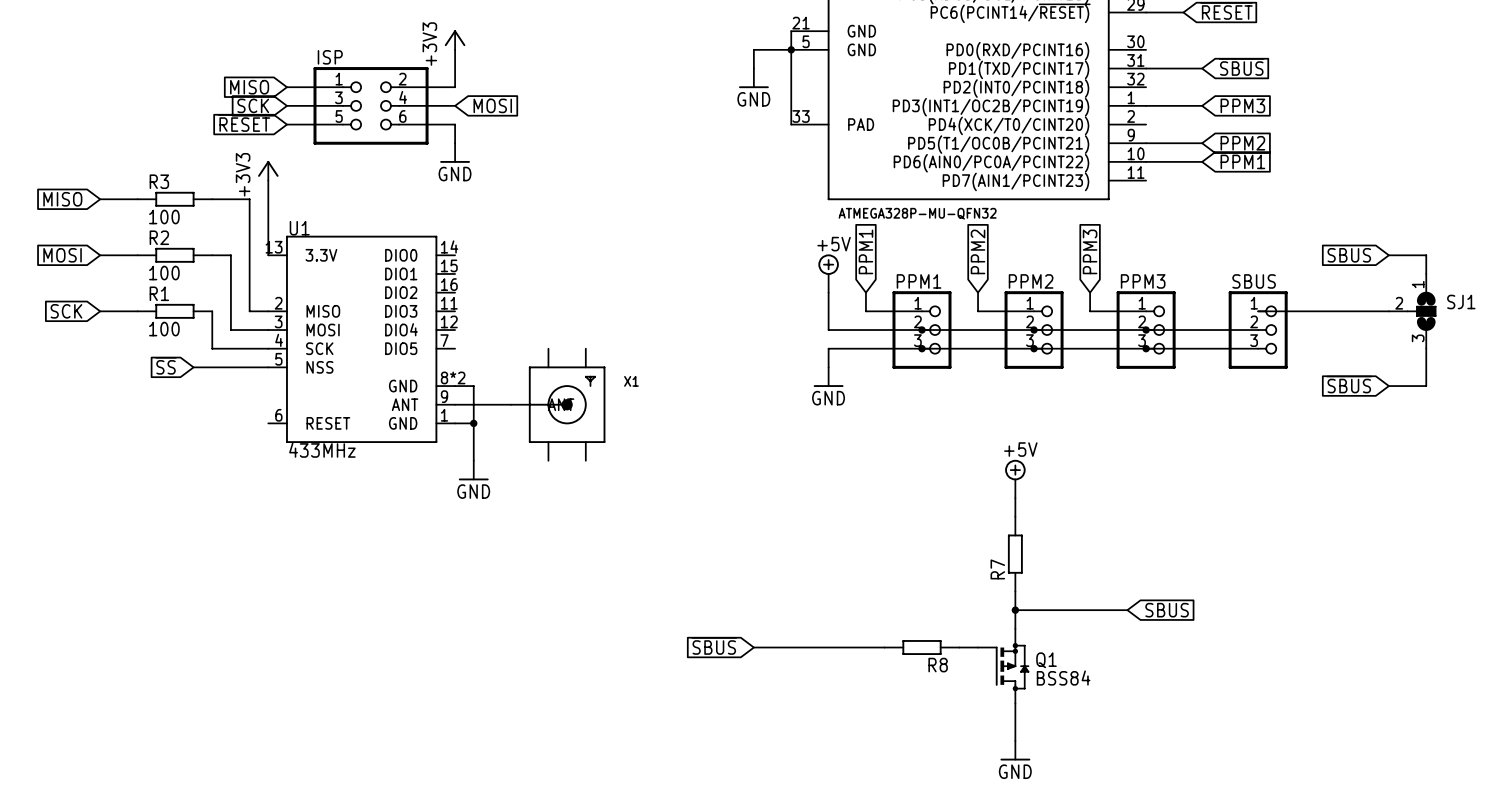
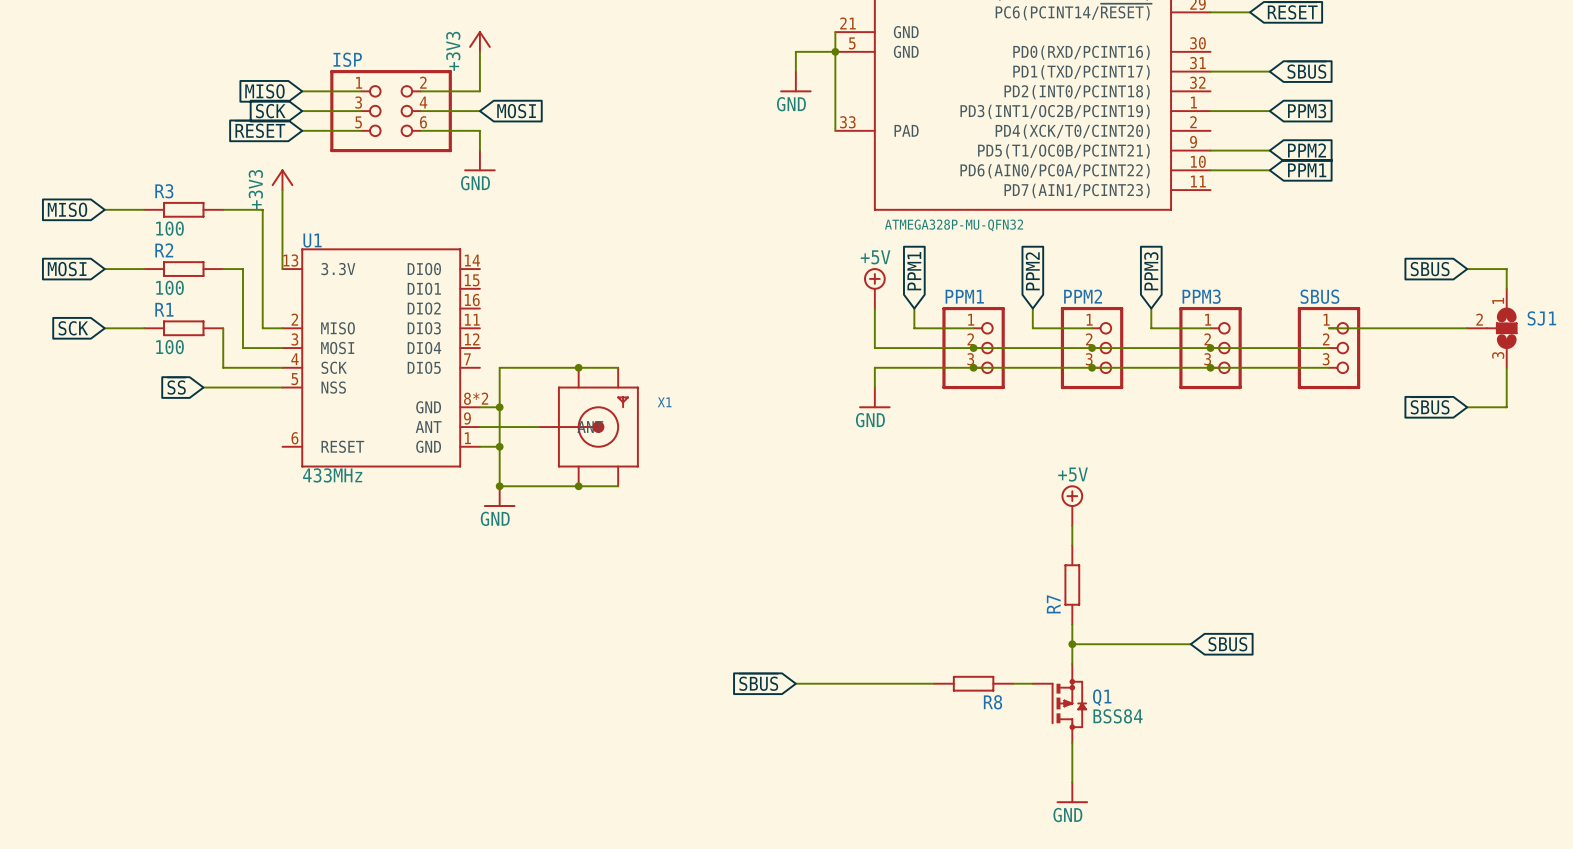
junction: none -> (578, 367)
wire: none -> (618, 367) (499, 367) (499, 407)
junction: none -> (499, 407)
wire: none -> (499, 486) (618, 486)
junction: none -> (499, 486)
junction: none -> (578, 486)

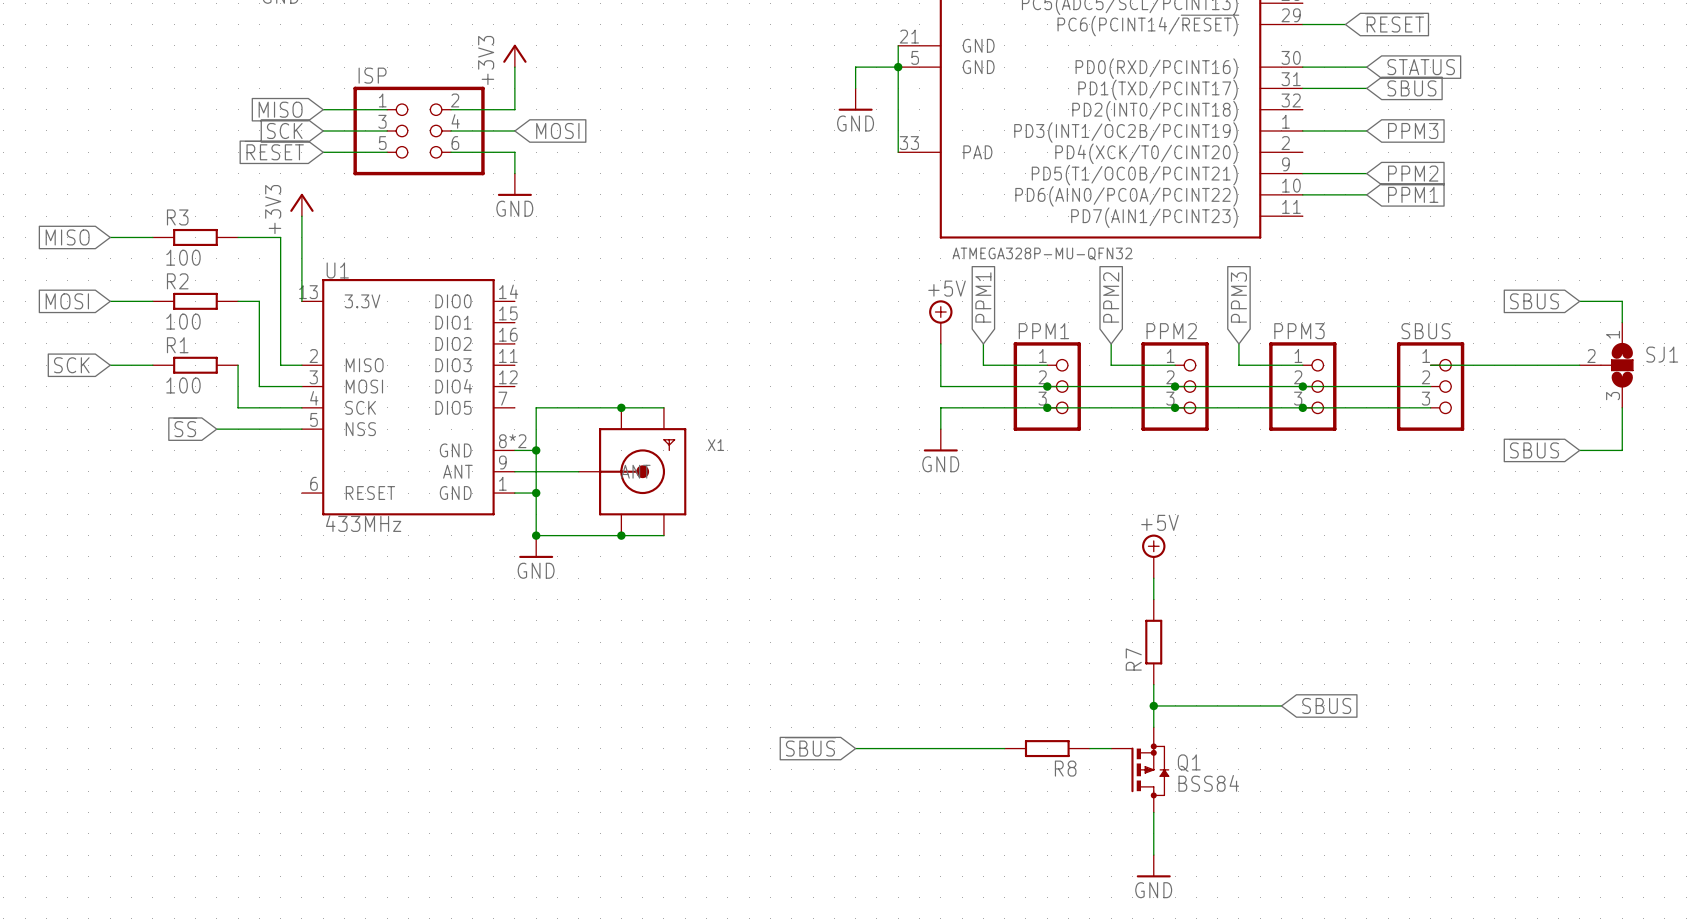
wire: none -> (1302, 67) (1366, 67)
global label: none -> STATUS (1421, 67)

